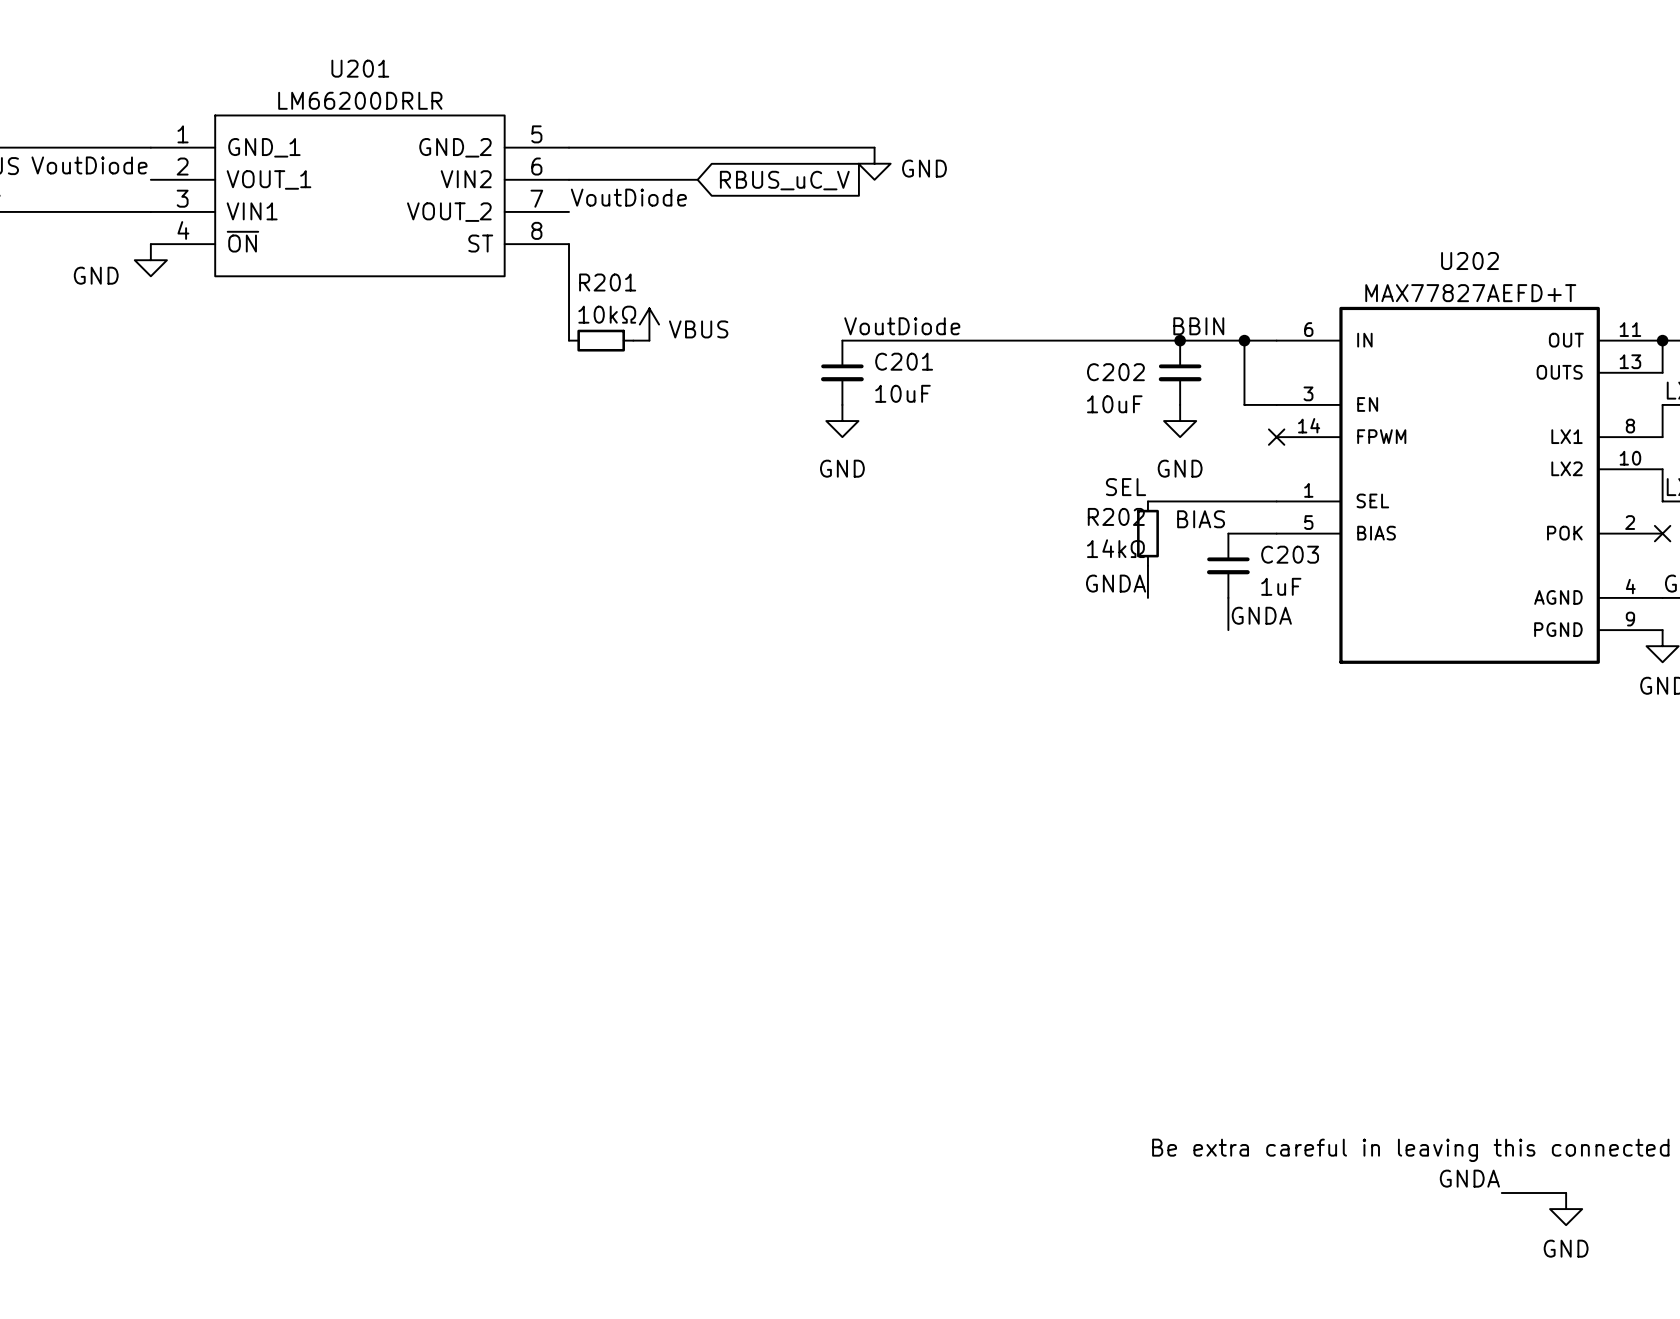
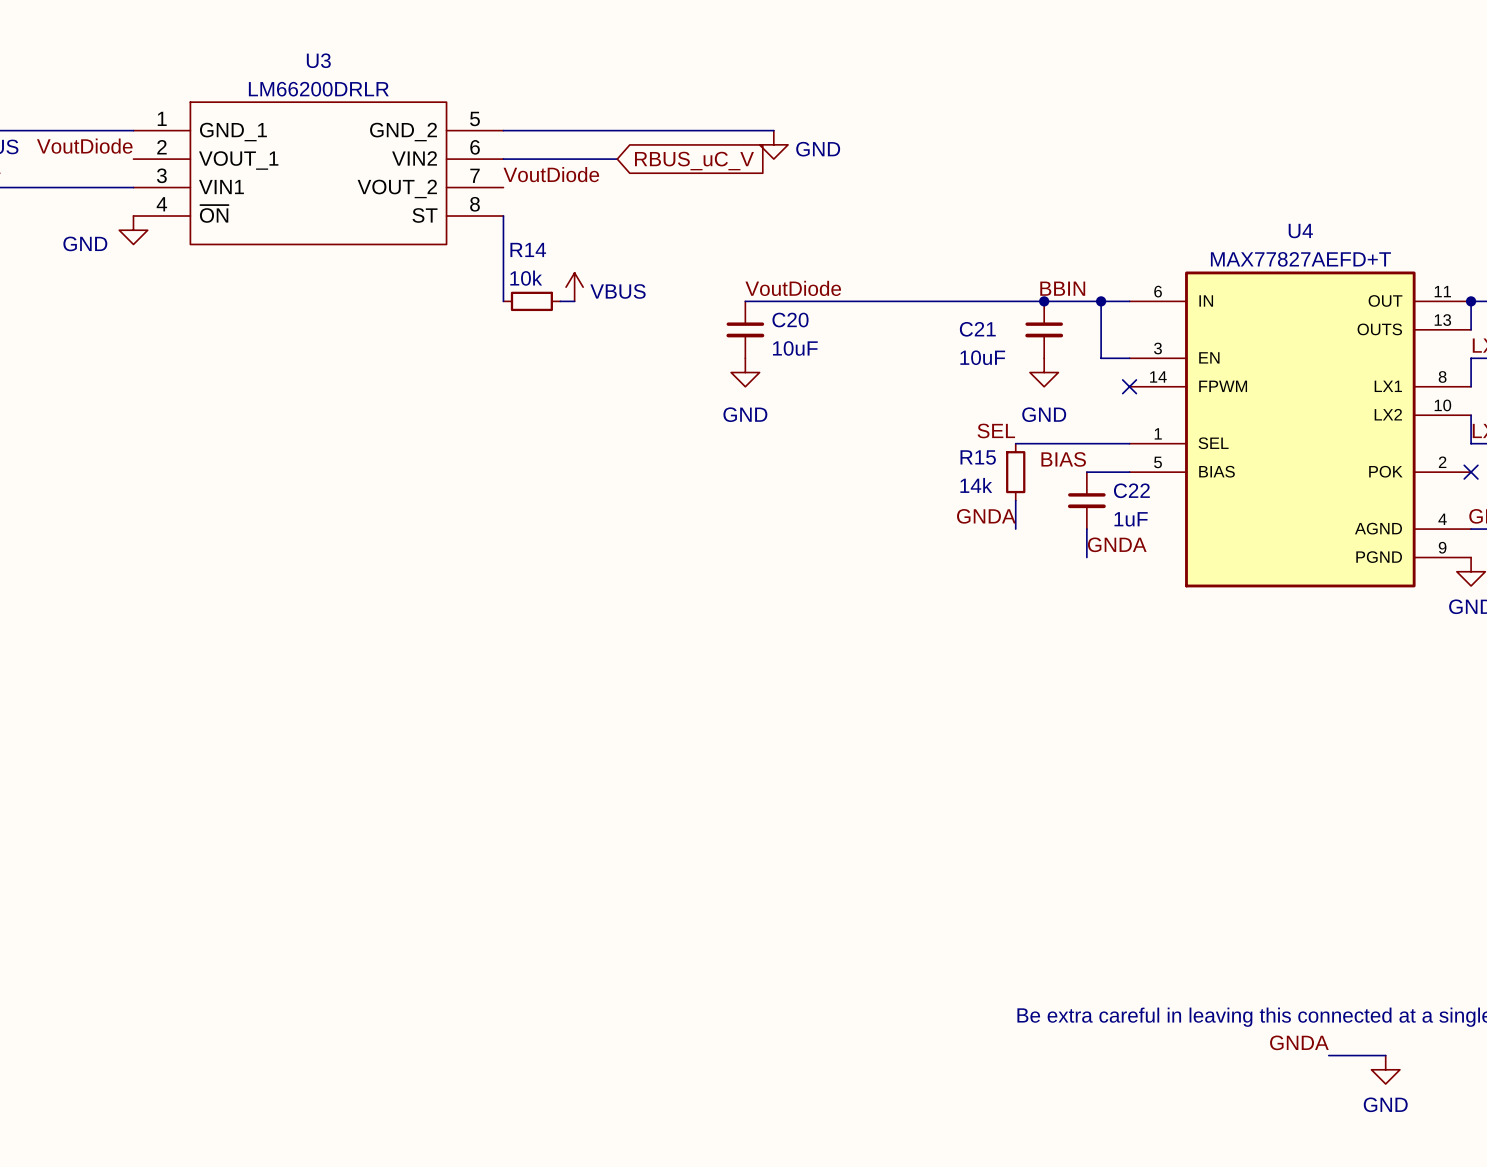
U201 name: U201 (360, 68) -> U3 (318, 60)
U202 name: U202 (1470, 261) -> U4 (1300, 231)
R201 name: R201 (607, 282) -> R14 (528, 249)
R201 value: 10kΩ (607, 314) -> 10k (526, 278)
C201 name: C201 (904, 361) -> C20 (790, 320)
C202 name: C202 (1115, 372) -> C21 (977, 329)
R202 name: R202 (1116, 516) -> R15 (978, 457)
R202 value: 14kΩ (1115, 548) -> 14k (976, 485)
C203 name: C203 (1290, 554) -> C22 (1131, 490)

